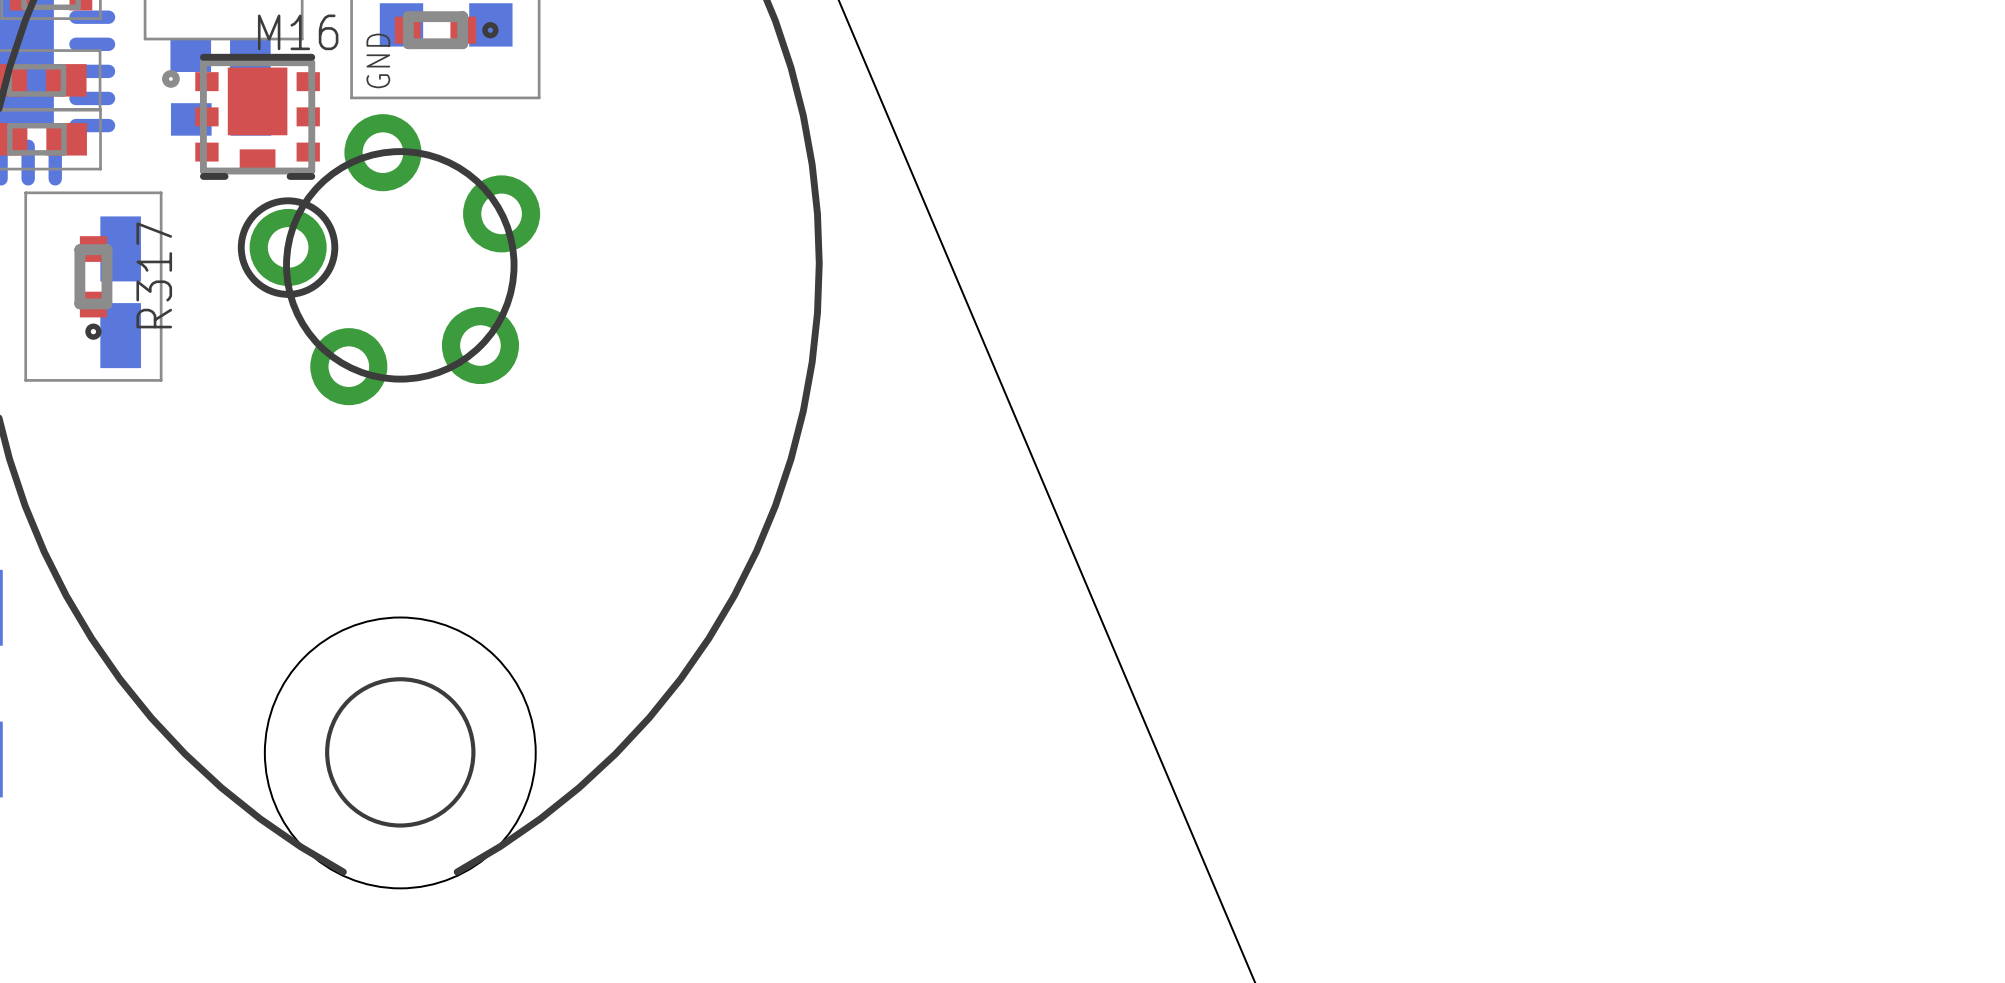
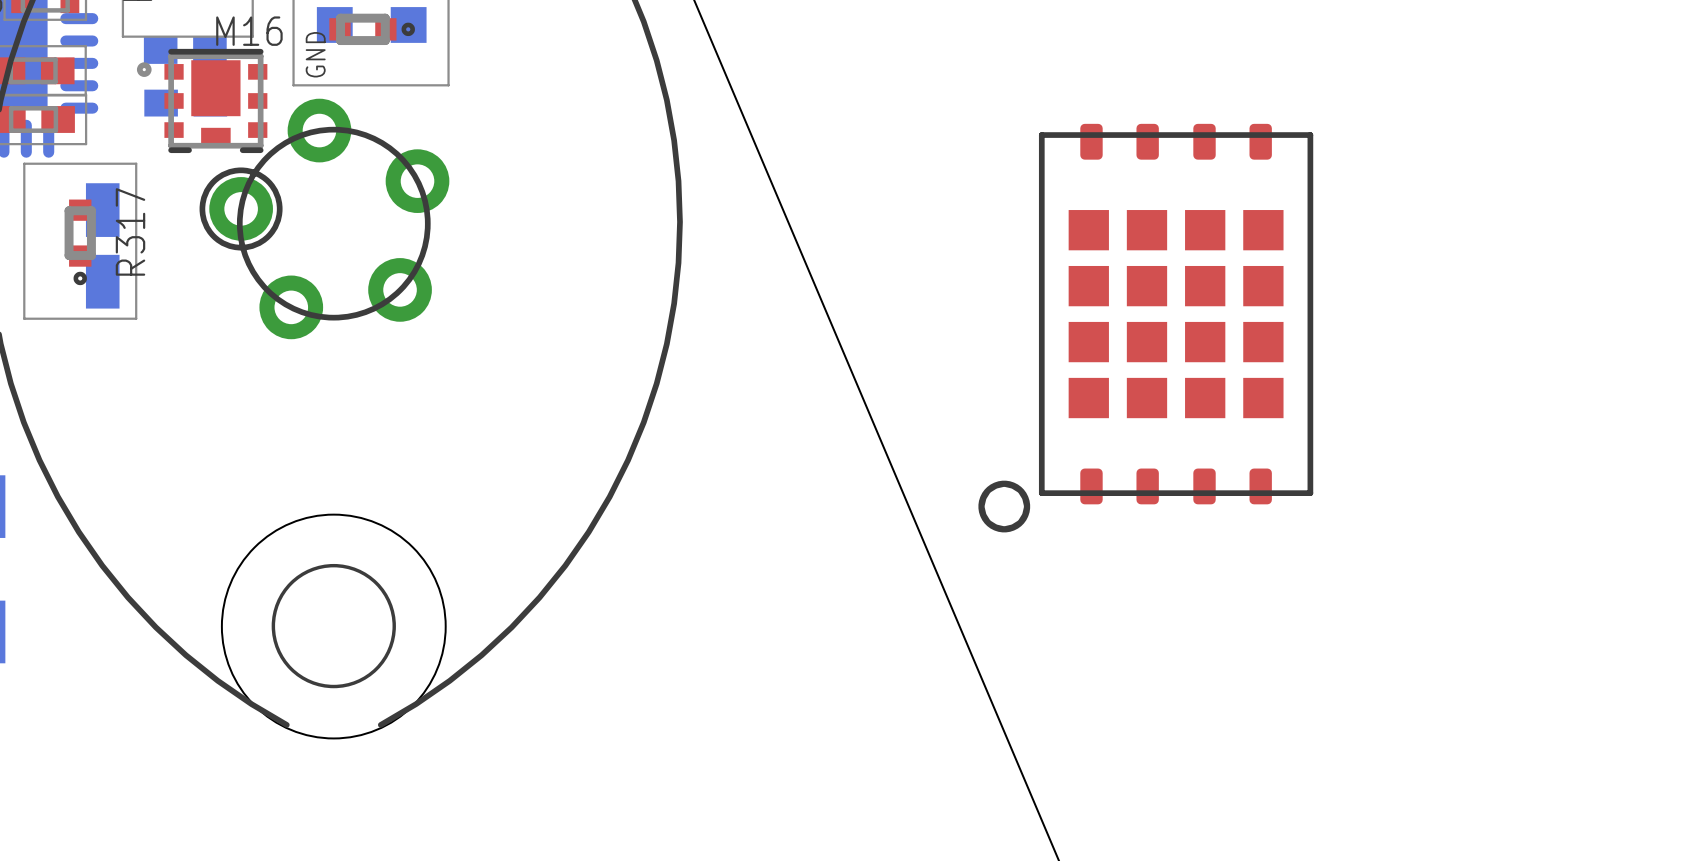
part: none -> (1145, 328)

